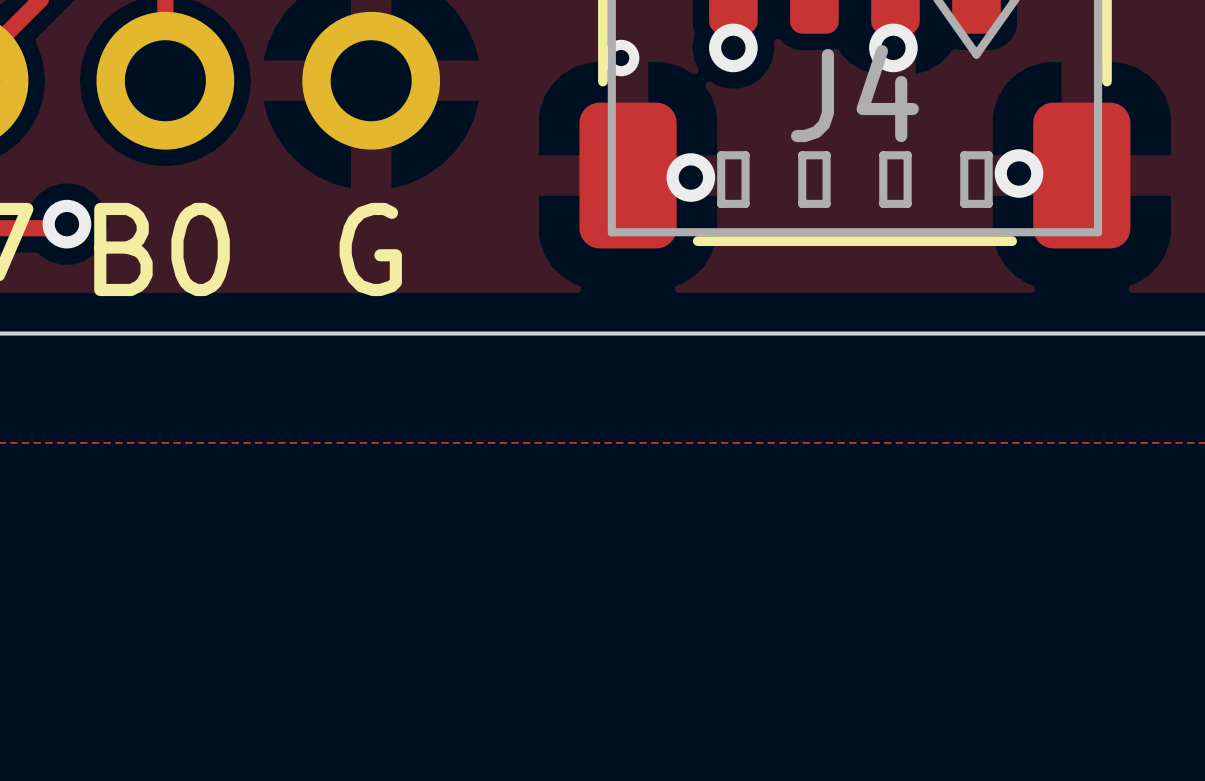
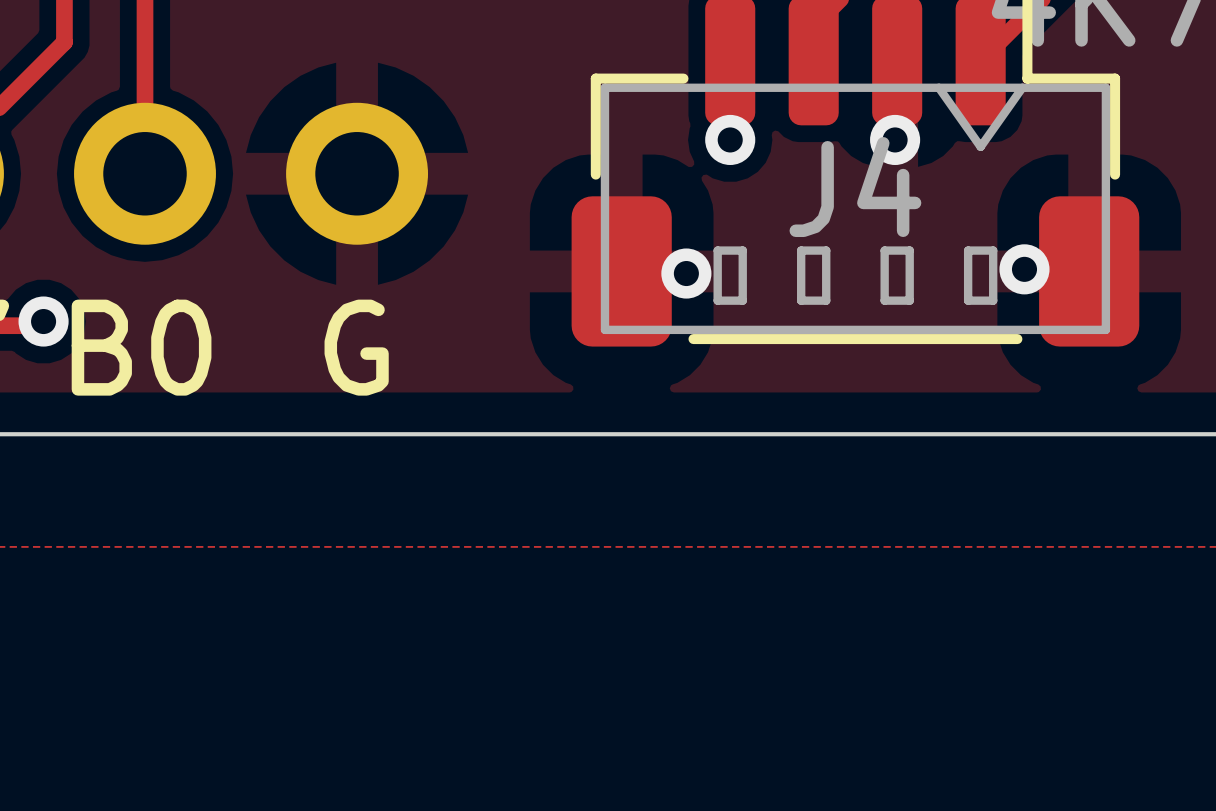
via: (621, 58) -> none

